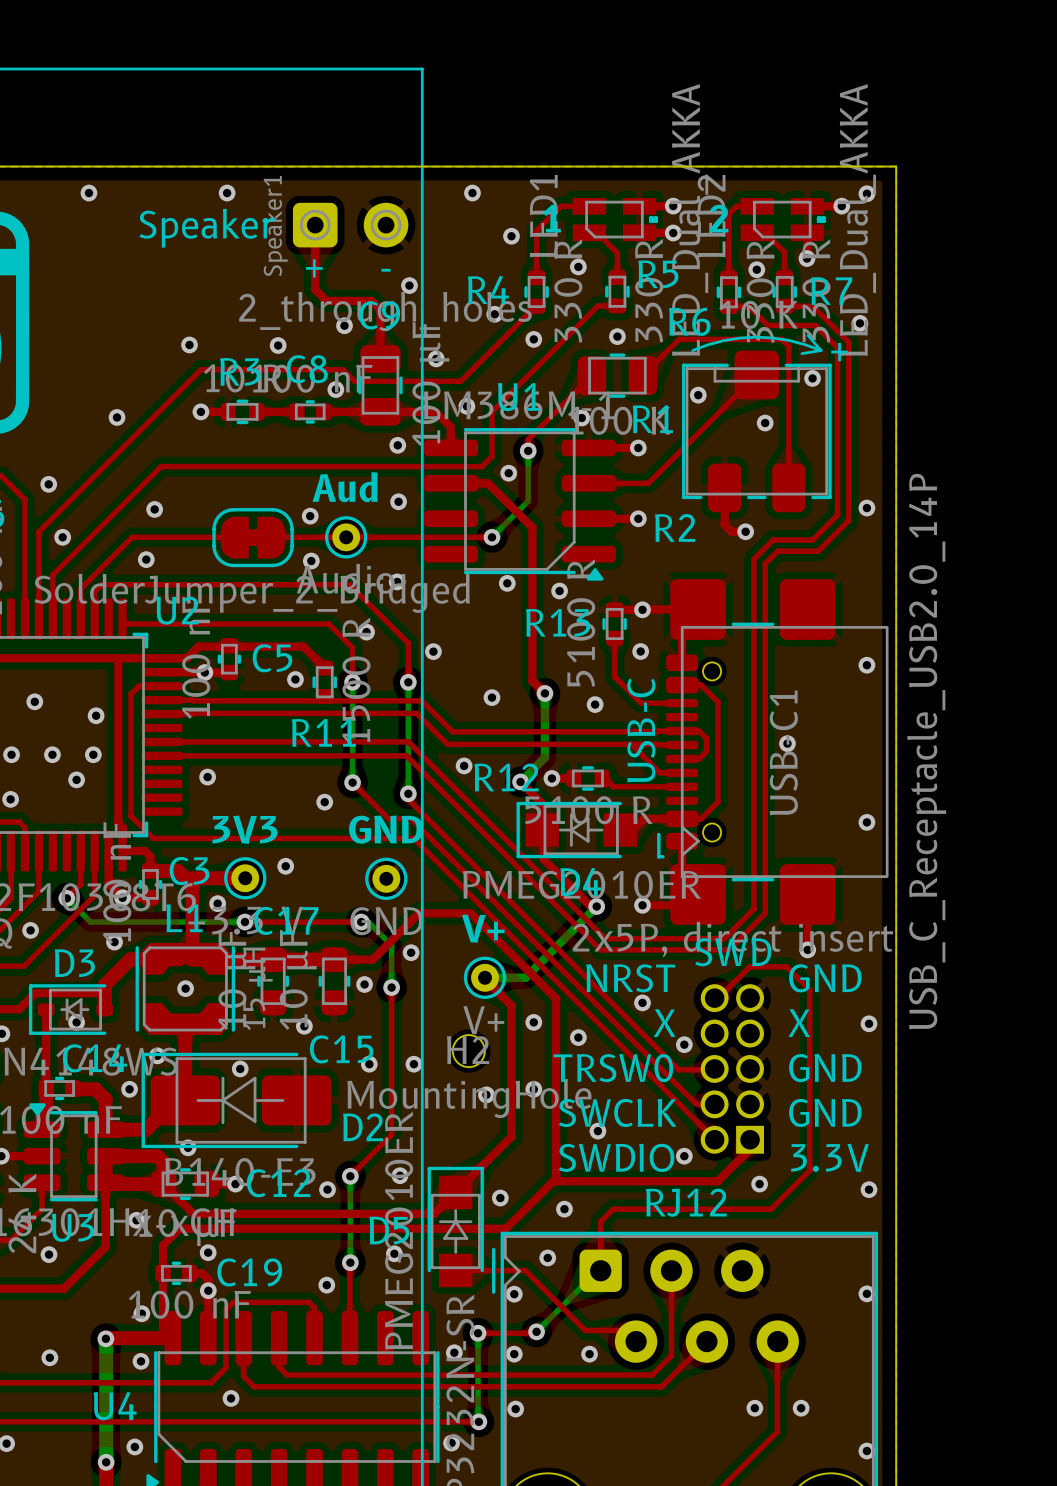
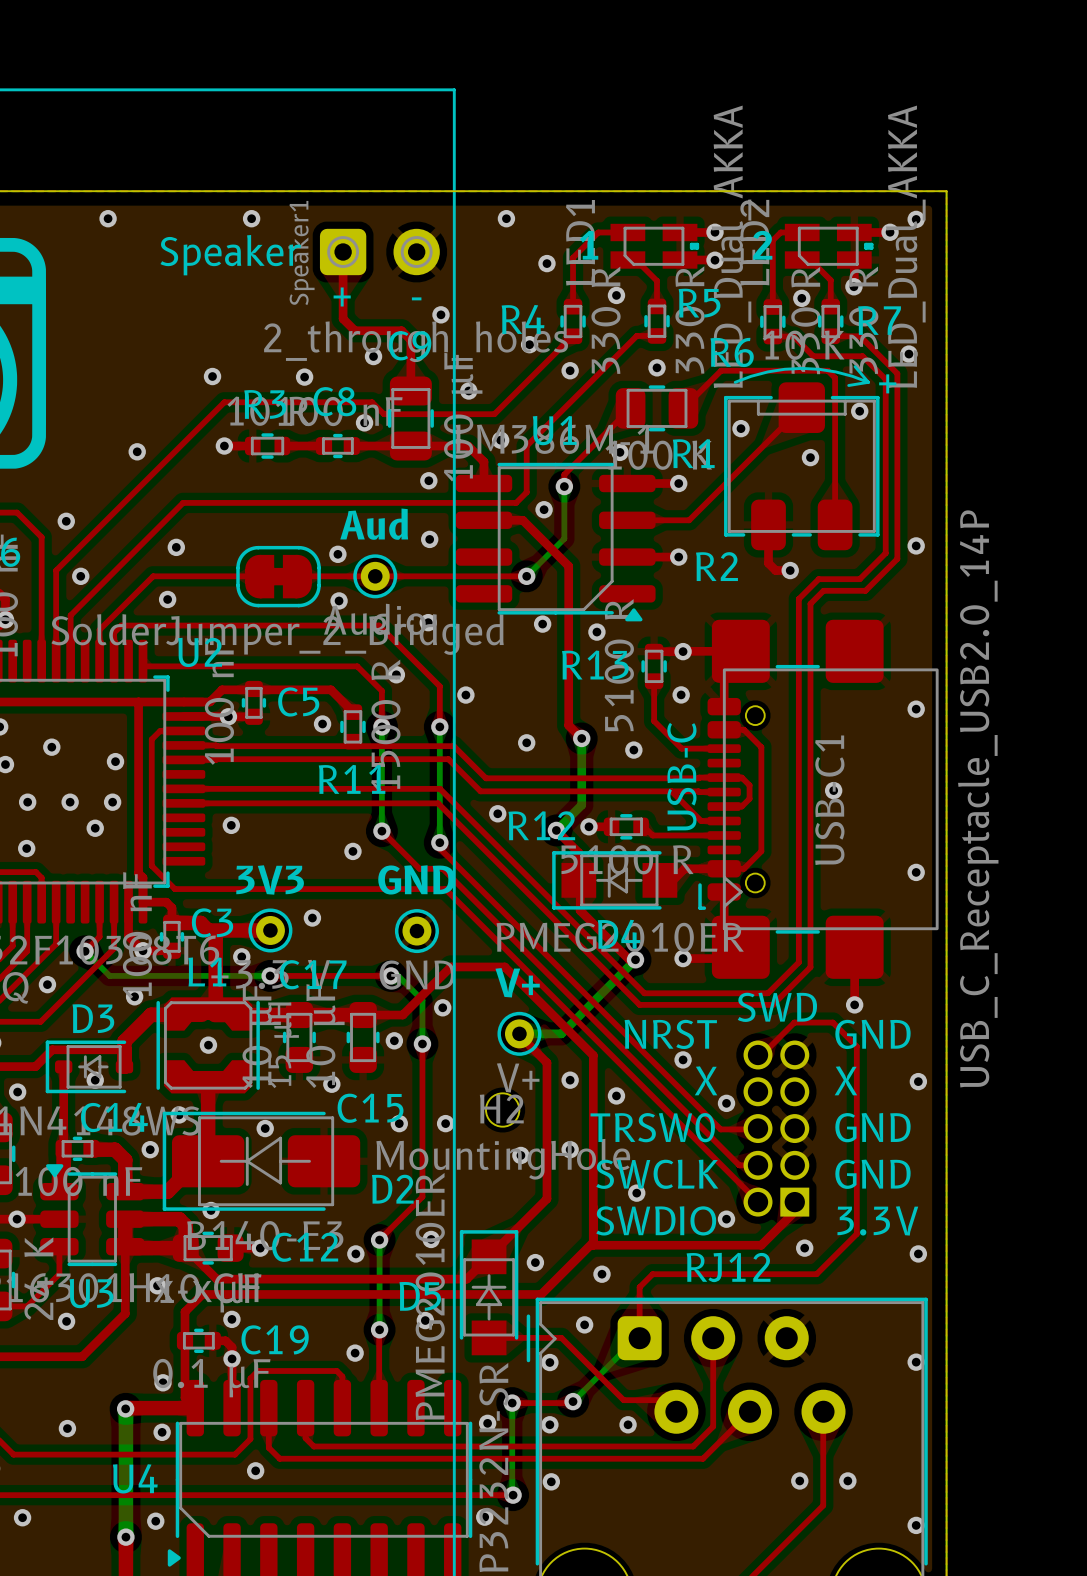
part value: 2x5P, direct insert (733, 939) -> none
C19 value: 100 nF (189, 1304) -> 0.1 µF (211, 1378)

